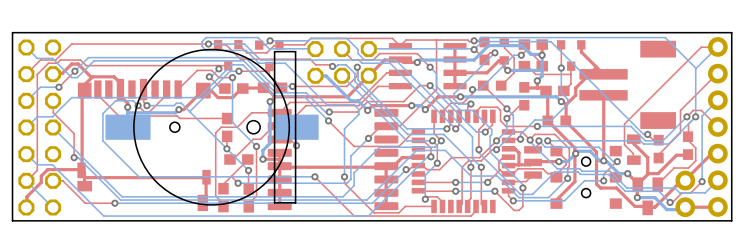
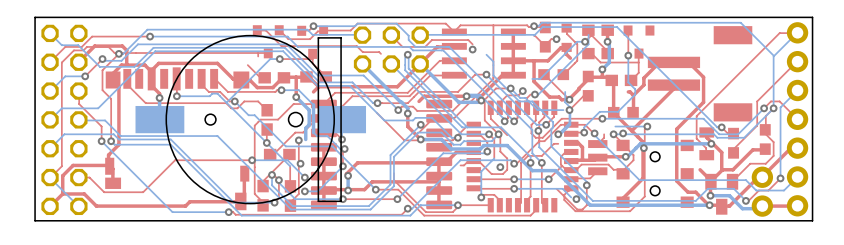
top track: (208, 44) (71, 44) (65, 50) -> (150, 36) (92, 36)
bottom track: none -> (246, 29) (147, 29) (123, 53) (118, 53)
via: (208, 44) -> none
bottom track: (244, 44) (260, 60) -> (285, 29) (307, 29)
bottom track: (264, 44) (258, 37) (206, 37) (202, 41) (202, 46) (206, 50) -> (150, 36) (244, 36)
top track: (581, 44) (581, 52) (603, 74) -> none
bottom track: none -> (588, 34) (588, 44) (538, 94) (534, 94)
via: (474, 49) -> none
via: none -> (150, 36)
bottom track: (494, 52) (454, 93) (454, 99) (458, 104) (470, 104) -> none
top track: (413, 53) (417, 53) (430, 67) -> (468, 40) (472, 44)
bottom track: (107, 57) (88, 57) (74, 71) -> (137, 44) (121, 60) (102, 59)
top track: (400, 59) (403, 62) (417, 62) -> none
bottom track: (122, 60) (94, 60) (77, 77) (71, 77) -> (153, 47) (134, 66) (99, 65)
bottom track: (255, 60) (258, 63) (285, 63) (326, 104) (354, 104) (358, 109) (358, 114) (344, 128) (344, 161) -> (297, 46) (303, 46)
bottom track: (417, 62) (419, 60) (474, 60) (488, 45) (522, 45) (530, 54) (542, 55) (542, 76) -> (609, 41) (609, 62) (607, 64)
bottom track: (242, 64) (231, 64) (198, 97) (71, 97) (52, 116) -> (284, 52) (155, 51) (98, 108) (78, 108)
top track: none -> (118, 53) (102, 70) (102, 90) (111, 98) (111, 141)
via: none -> (118, 53)
bottom track: (332, 66) (346, 64) (354, 73) -> (405, 57) (405, 61)
via: (332, 66) -> none
top track: (357, 67) (357, 76) (346, 86) (292, 86) -> none
via: (430, 67) -> none
top track: (596, 67) (575, 88) -> none
bottom track: (218, 68) (209, 76) -> none
via: (218, 68) -> none
via: (507, 70) -> none
bottom track: (542, 70) (507, 70) -> none
top track: none -> (534, 60) (534, 81) (549, 97) (568, 99) (588, 78) (588, 76)
top track: (53, 73) (62, 73) (71, 64) (78, 64) (91, 77) -> (79, 61) (94, 46) (122, 46) (126, 50) (126, 65)
bottom track: none -> (420, 63) (458, 102) (477, 102)
via: (209, 76) -> none
bottom track: (315, 76) (326, 76) (350, 100) (358, 100) (367, 110) -> (362, 64) (407, 108) (407, 113)
top track: (232, 77) (218, 77) (211, 70) (197, 70) (178, 89) -> (281, 90) (275, 91) (227, 91) (214, 78)
bottom track: (232, 77) (232, 122) (256, 146) -> none
via: (232, 77) -> none
bottom track: none -> (337, 75) (363, 75) (398, 110)
via: (292, 86) -> none
top track: none -> (513, 75) (502, 74) (477, 99) (477, 102)
top track: none -> (296, 77) (296, 97)
top track: (166, 89) (166, 95) (149, 112) -> (201, 78) (201, 85) (208, 91) (220, 91) (229, 101) (234, 101)
top track: (472, 89) (472, 93) (462, 103) (449, 104) -> (522, 91) (518, 95) (507, 95)
via: (472, 89) -> none
top track: (84, 90) (82, 94) (81, 170) (85, 177) (206, 177) -> (113, 80) (118, 86) (118, 144) (108, 155) (109, 166)
top track: (203, 90) (183, 109) (178, 109) -> (241, 80) (233, 78) (217, 63) (158, 63) (151, 70) (151, 78)
top track: (603, 95) (603, 160) -> (673, 85) (673, 89) (631, 130)
top track: (460, 96) (438, 96) (425, 109) -> none
bottom track: (460, 96) (556, 96) (561, 101) -> none
via: (460, 96) -> none
top track: none -> (510, 88) (496, 88) (484, 99) (484, 120) (490, 126)
bottom track: none -> (510, 88) (520, 97) (525, 97) (537, 110) (563, 110)
via: none -> (510, 88)
via: none -> (281, 90)
via: none -> (522, 91)
bottom track: (270, 101) (270, 113) -> (281, 90) (298, 90) (313, 104)
via: (270, 101) -> none
bottom track: none -> (565, 91) (565, 102) (570, 107) (570, 124) (558, 136)
via: (561, 101) -> none
top track: none -> (466, 94) (466, 97) (452, 110) (417, 110) (412, 106) (401, 106) (398, 110)
bottom track: none -> (466, 94) (479, 94) (502, 117) (502, 121)
via: (470, 104) -> none
via: none -> (534, 94)
top track: (138, 105) (144, 112) -> (145, 103) (177, 103)
bottom track: (138, 105) (133, 100) (115, 100) (102, 113) (102, 140) (138, 176) (314, 176) -> none
via: (138, 105) -> none
via: none -> (176, 96)
via: (146, 105) -> none
bottom track: none -> (296, 97) (309, 110) (309, 124) (305, 128) (305, 139)
via: none -> (296, 97)
bottom track: (506, 108) (513, 115) (513, 132) (496, 149) -> none
bottom track: (178, 109) (175, 112) (127, 112) -> none
via: (178, 109) -> none
bottom track: none -> (234, 101) (248, 115) (254, 115) (285, 146) (332, 146) (375, 189)
via: none -> (234, 101)
via: (367, 110) -> none
top track: (114, 112) (118, 116) (226, 118) -> (182, 103) (226, 103) (231, 108) (237, 108) (244, 101) (258, 101) (266, 110)
top track: (476, 116) (476, 111) (480, 107) (497, 107) (500, 110) (500, 120) (506, 126) -> (536, 107) (535, 120) (531, 124) (531, 133) (535, 137) (542, 137) (561, 118) (568, 118)
via: none -> (398, 110)
bottom track: none -> (376, 112) (384, 120) (412, 120) (415, 117) (432, 117) (451, 137) (457, 137)
via: (328, 120) -> none
top track: (565, 120) (596, 152) (596, 184) (600, 188) (616, 188) (635, 206) -> (643, 78) (659, 62) (689, 63) (703, 77) (703, 102) (676, 129) (676, 181) (688, 192) (695, 192) (708, 205)
top track: none -> (407, 113) (407, 126) (420, 139)
via: none -> (407, 113)
top track: (434, 126) (434, 133) -> (490, 118) (507, 135)
bottom track: (53, 128) (122, 196) (342, 196) (354, 185) (354, 172) (379, 147) (409, 147) -> (79, 120) (105, 120) (120, 136) (217, 136) (291, 209) (370, 209) (393, 186) (393, 173)
bottom track: (446, 128) (406, 128) -> (467, 127) (461, 121)
bottom track: none -> (420, 124) (390, 155) (390, 184) (368, 206) (292, 206) (272, 185) (272, 174)
via: none -> (420, 124)
top track: none -> (571, 124) (560, 124) (544, 141) (539, 141) (516, 163) (514, 163)
top track: (521, 132) (530, 140) (534, 134) (554, 134) (569, 148) (567, 178) -> (585, 124) (594, 134)
bottom track: none -> (647, 126) (615, 126)
via: none -> (647, 126)
via: none -> (538, 130)
bottom track: (368, 138) (350, 156) (350, 179) (346, 183) (238, 183) -> none
via: (368, 138) -> none
bottom track: (270, 139) (270, 143) (262, 150) (262, 159) -> (313, 132) (316, 136) (327, 136) (340, 149) (344, 149)
top track: (496, 140) (479, 157) (451, 157) (439, 169) (426, 169) -> (498, 134) (500, 136) (500, 151) (507, 158) (507, 169) (502, 174) (491, 174) (483, 165)
bottom track: (538, 140) (545, 147) (598, 147) (613, 161) (617, 161) -> none
via position: (538, 140) -> (623, 133)
via: none -> (457, 137)
bottom track: none -> (420, 139) (441, 139) (451, 149) (480, 149) (483, 145) (507, 145) (532, 170) (555, 170) (590, 205) (709, 205)
via: none -> (420, 139)
top track: (74, 147) (74, 157) -> none
bottom track: none -> (101, 141) (172, 212) (228, 212)
via: none -> (101, 141)
bottom track: none -> (111, 141) (114, 144) (170, 144) (241, 215)
via: none -> (111, 141)
bottom track: none -> (464, 141) (460, 144) (453, 144) (441, 132) (418, 132) (393, 156)
via: (478, 149) -> none
via: (496, 149) -> none
bottom track: none -> (711, 143) (640, 143) (626, 157)
via: none -> (711, 143)
bottom track: (26, 154) (37, 164) (52, 164) (103, 216) (203, 216) -> (50, 148) (64, 134) (113, 134) (118, 139) (170, 139) (233, 202) (274, 202)
top track: none -> (344, 149) (342, 150) (342, 166)
via: none -> (344, 149)
bottom track: (430, 156) (427, 156) (368, 216) (359, 216) -> (457, 205) (420, 205) (410, 215)
bottom track: (74, 157) (78, 157) (120, 200) (366, 200) (416, 150) (445, 150) (470, 176) (497, 176) (518, 197) (548, 197) (567, 178) -> none
via: (74, 157) -> none
bottom track: none -> (487, 153) (443, 153) (397, 199)
via: (262, 159) -> none
top track: (279, 159) (262, 159) -> none
via: (603, 160) -> none
bottom track: (558, 161) (567, 161) (578, 151) (590, 151) (599, 160) (606, 161) (618, 173) (627, 173) -> none
top track: (617, 161) (603, 174) (603, 180) -> none
via: (617, 161) -> none
via: (437, 163) -> none
bottom track: none -> (252, 160) (287, 160) (304, 177)
via: none -> (252, 160)
top track: (279, 166) (310, 167) -> (348, 175) (346, 174) (357, 162)
via: none -> (300, 163)
bottom track: none -> (514, 163) (510, 160) (460, 160) (412, 208) (407, 208)
via: none -> (514, 163)
bottom track: (557, 168) (610, 171) (626, 188) (674, 188) -> (624, 164) (639, 180) (745, 180) (751, 185)
bottom track: (406, 169) (372, 203) (114, 203) -> none
via: (406, 169) -> none
via: (248, 170) -> none
bottom track: none -> (342, 166) (317, 191) (304, 191)
via: none -> (342, 166)
via: none -> (500, 167)
via: (627, 173) -> none
top track: (41, 176) (41, 182) (26, 196) (26, 207) -> (66, 172) (62, 175) (62, 193)
top track: (314, 176) (354, 216) (372, 216) -> (375, 189) (398, 189) (424, 215)
via: (314, 176) -> none
via: (344, 176) -> none
via: none -> (272, 174)
via: (567, 178) -> none
bottom track: none -> (348, 175) (348, 190)
via: none -> (348, 175)
via: none -> (304, 177)
bottom track: (603, 180) (584, 180) (564, 200) (513, 200) -> none
via: (603, 180) -> none
top track: none -> (438, 181) (372, 181) (364, 189) (323, 190)
top track: none -> (278, 182) (278, 198) (274, 202)
bottom track: none -> (278, 182) (295, 199) (342, 199)
bottom track: none -> (556, 188) (562, 188) (571, 197)
via: (494, 191) -> none
top track: (508, 191) (508, 196) (513, 200) -> (571, 188) (564, 194) (564, 200) (575, 211) (630, 211) (644, 196) (644, 129) (647, 126)
bottom track: (634, 191) (625, 191) (608, 174) (554, 172) (532, 194) (520, 194) -> (707, 188) (695, 200) (592, 200) (584, 192)
via: none -> (348, 190)
via: none -> (375, 189)
via: none -> (304, 191)
top track: (76, 194) (85, 203) (114, 203) -> (104, 192) (143, 192) (175, 160) (252, 160)
top track: none -> (62, 193) (50, 206)
top track: none -> (62, 193) (84, 193) (96, 206) (185, 206) (189, 201) (240, 201)
via: none -> (342, 199)
top track: none -> (397, 199) (342, 199)
via: none -> (397, 199)
via: (114, 203) -> none
via: none -> (274, 202)
via: none -> (457, 205)
via: none -> (709, 205)
top track: none -> (407, 208) (401, 214) (235, 214) (233, 212) (228, 212)
via: none -> (407, 208)
via: none -> (228, 212)

